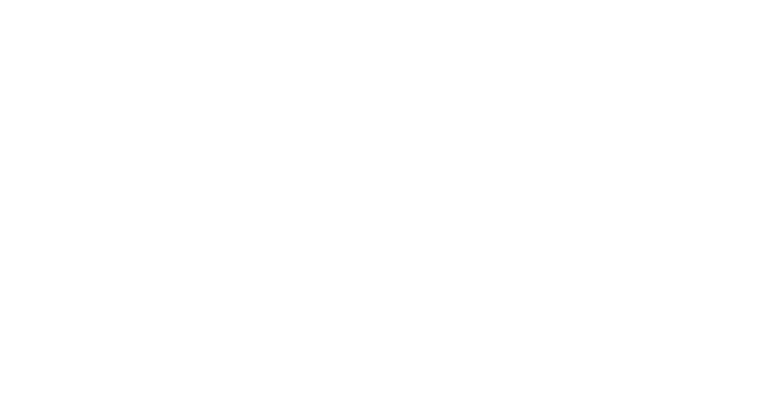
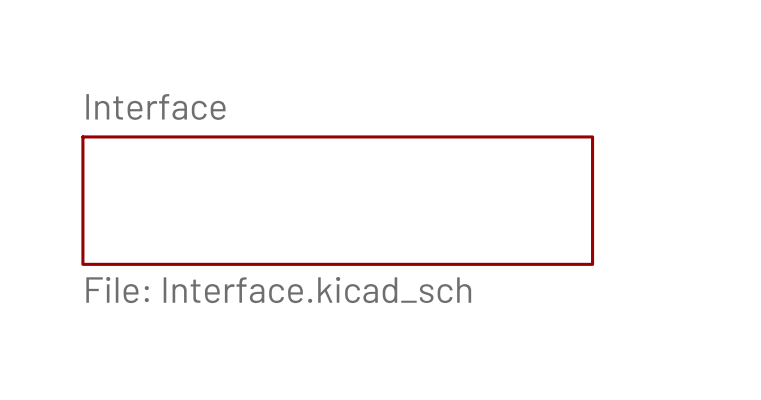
sheet Interface: none -> File: Interface.kicad_sch (337, 200)

